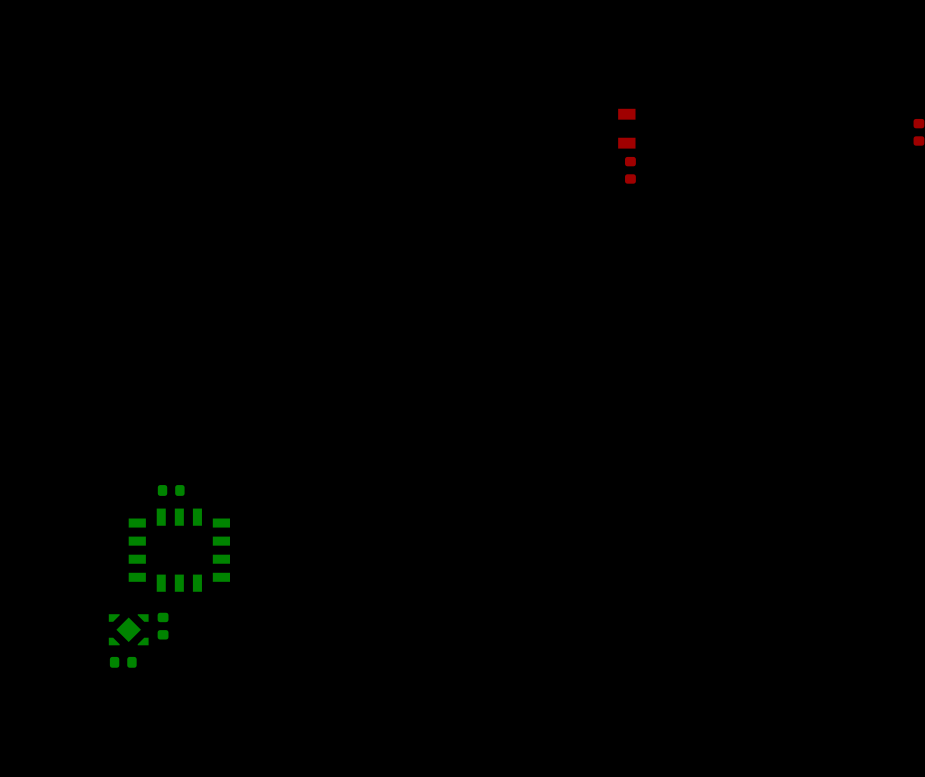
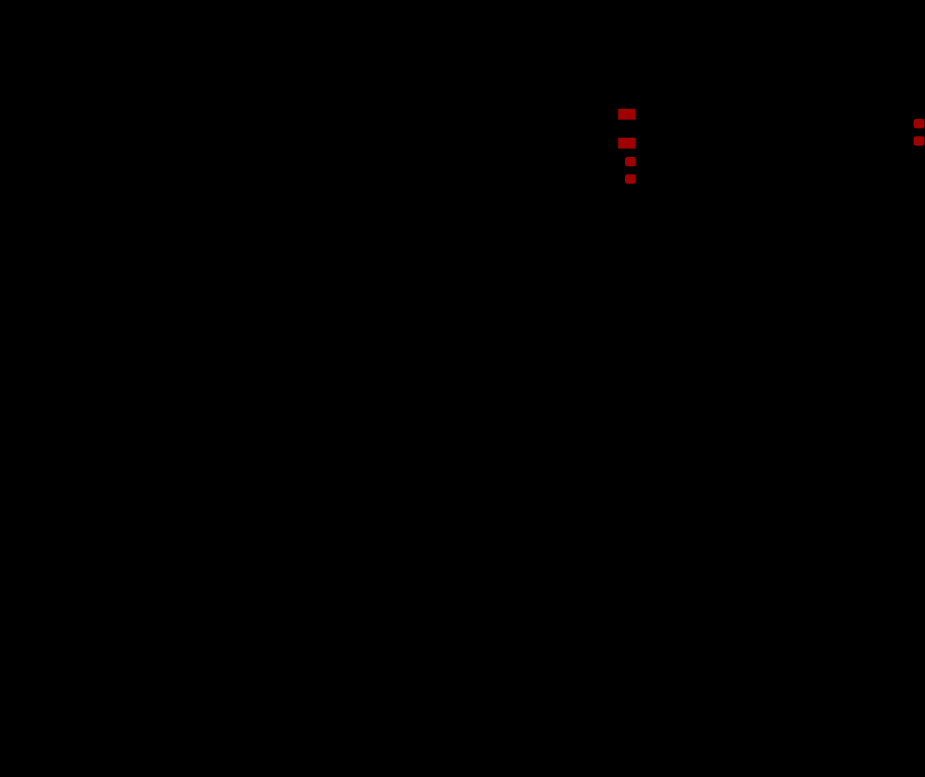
part: (171, 490) -> none
part: (179, 550) -> none
part: (163, 626) -> none
part: (128, 629) -> none
part: (123, 662) -> none

